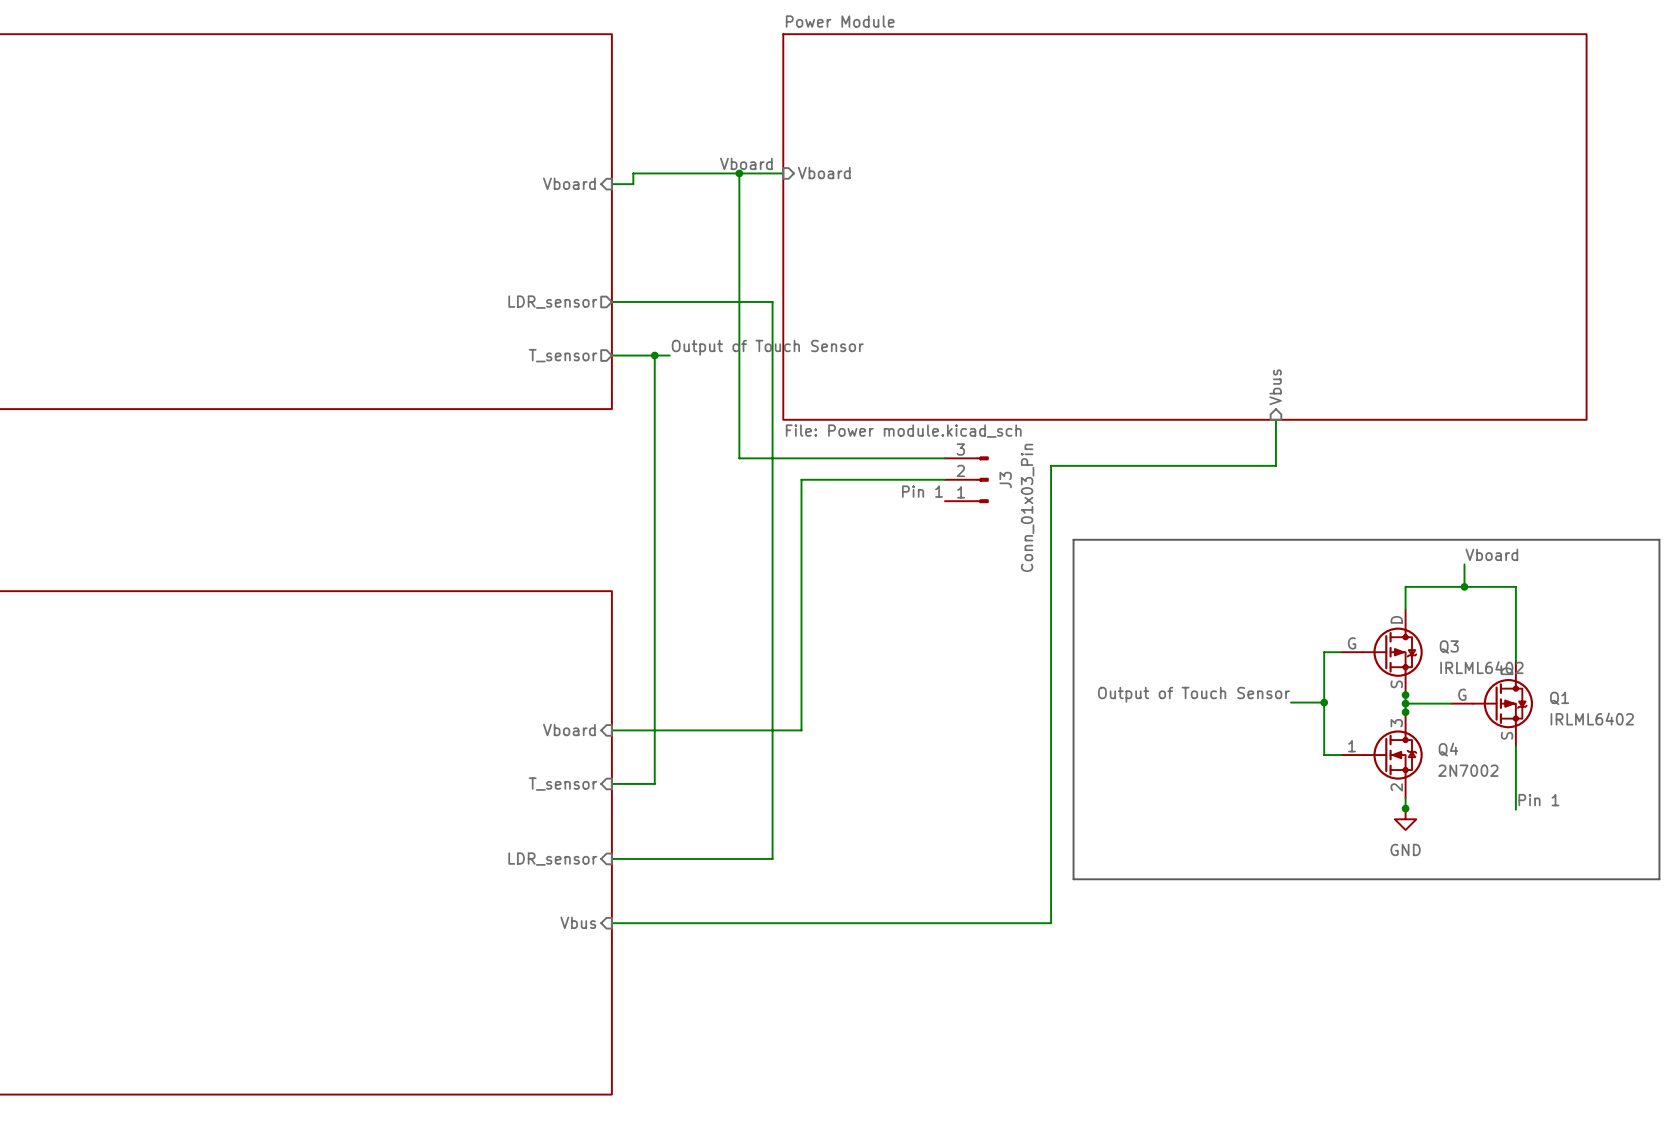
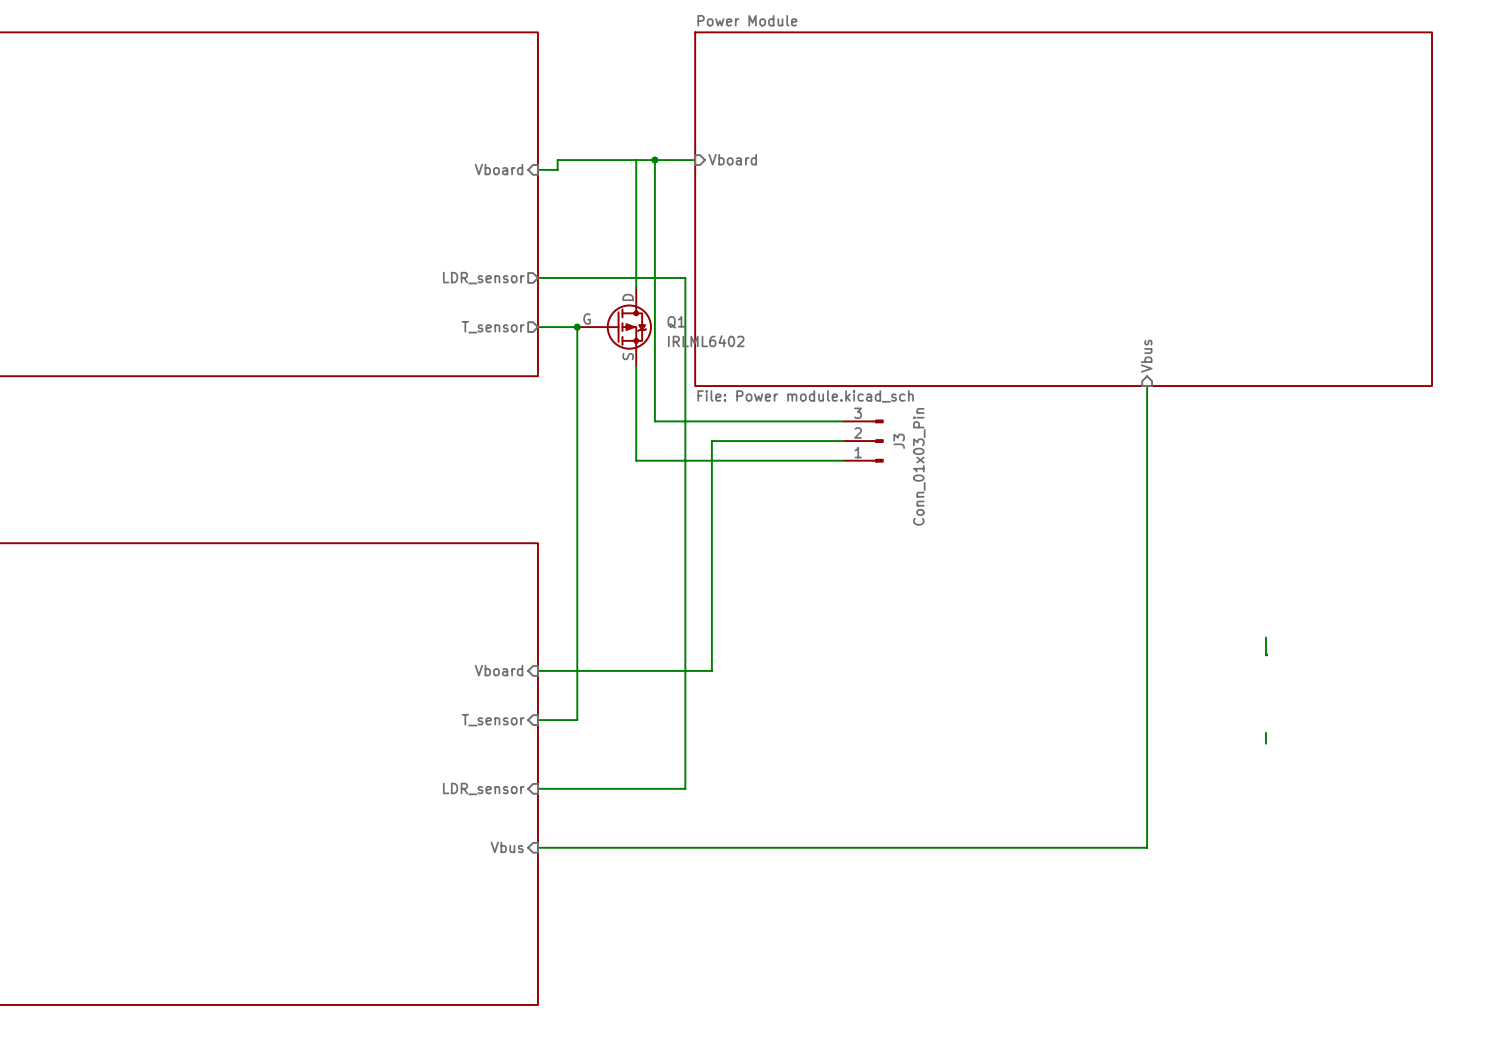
label: Vboard (746, 163) -> none
wire: none -> (636, 160) (636, 287)
label: Output of Touch Sensor (767, 347) -> none
wire: none -> (636, 366) (636, 460) (843, 460)
wire: (1275, 465) (1051, 465) (1051, 923) -> (1147, 428) (1147, 847) (940, 847)
label: Pin 1 (922, 491) -> none
line: (1073, 539) (1659, 539) (1659, 879) (1073, 879) (1073, 539) -> none
label: Vboard (1491, 554) -> none
wire: (1464, 564) (1464, 586) -> none
junction: (1464, 586) -> none
wire: (1405, 609) (1405, 586) (1515, 586) (1515, 660) -> none
wire: (1341, 652) (1324, 652) (1324, 755) (1341, 755) -> none
Q3: IRLML6402 (1382, 652) -> none
label: Output of Touch Sensor (1193, 694) -> none
junction: (1405, 695) -> none
wire: (1290, 702) (1324, 702) -> none
junction: (1324, 702) -> none
wire: (1405, 703) (1451, 703) -> none
junction: (1405, 703) -> none
Q1 position: (1492, 703) -> (614, 327)
junction: (1405, 712) -> none
wire: (1515, 746) (1515, 809) -> none
Q4: 2N7002 (1382, 755) -> none
label: Pin 1 (1538, 800) -> none
junction: (1405, 808) -> none
power symbol: GND (1405, 819) -> none

